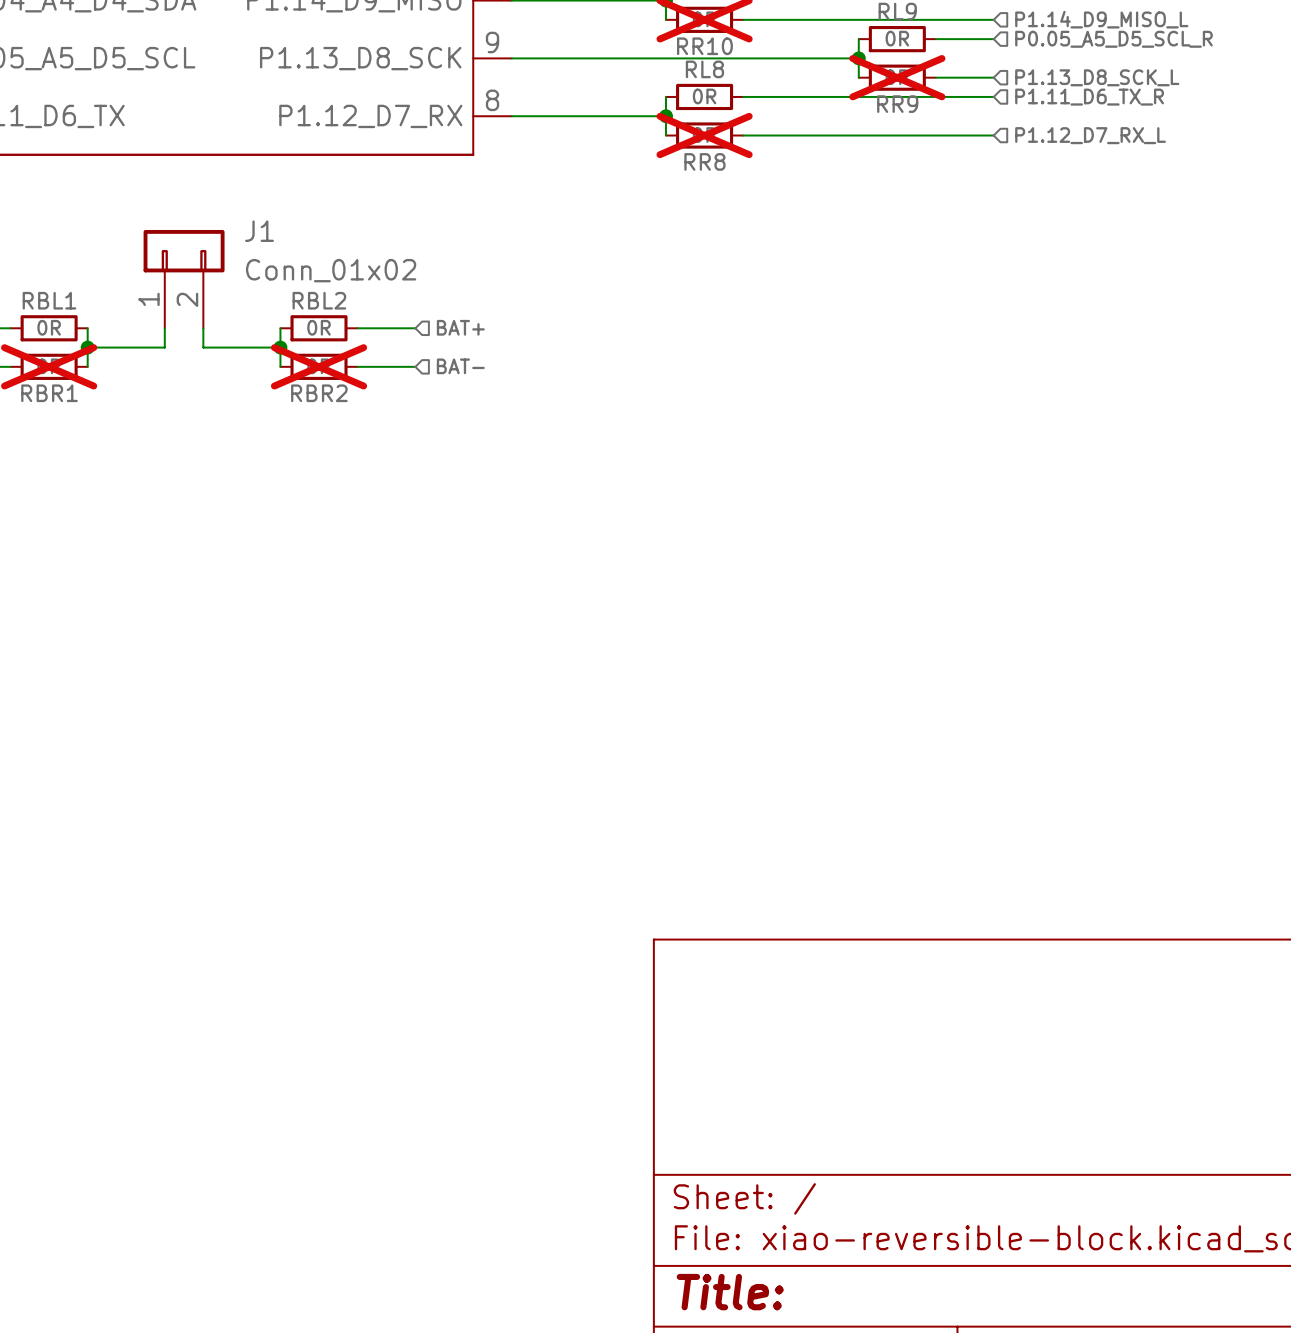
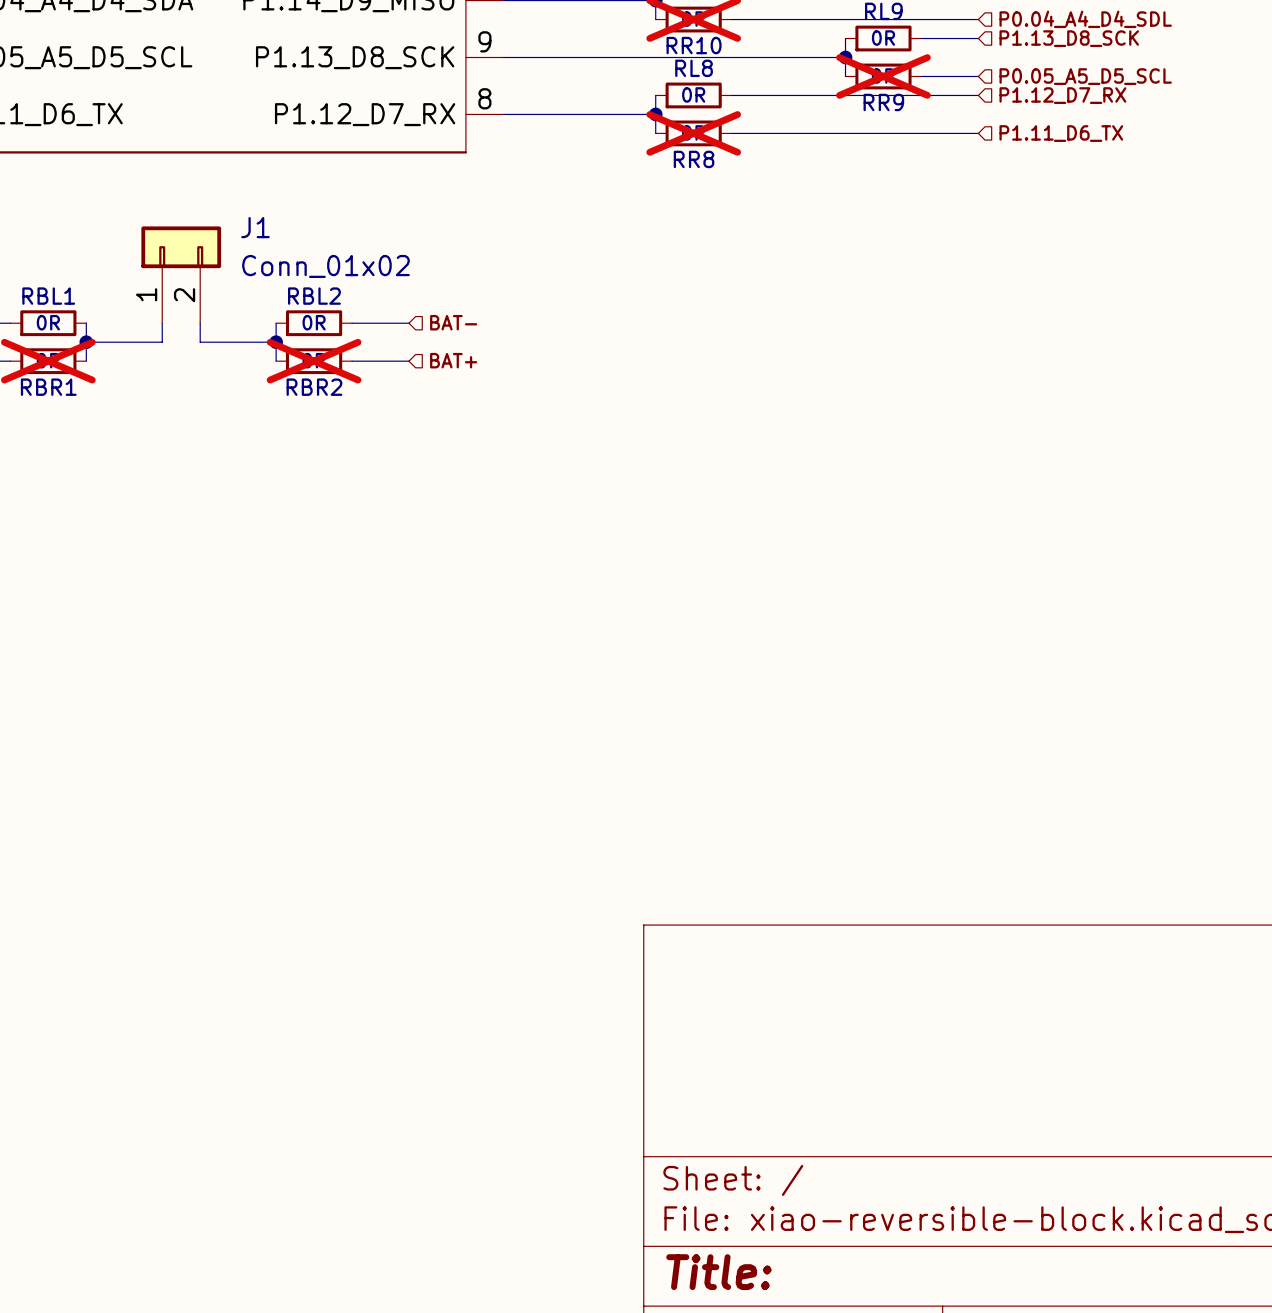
hierarchical label: P1.14_D9_MISO_L (1101, 19) -> P0.04_A4_D4_SDL (1085, 19)
hierarchical label: P0.05_A5_D5_SCL_R (1113, 39) -> P1.13_D8_SCK (1069, 38)
hierarchical label: P1.13_D8_SCK_L (1097, 77) -> P0.05_A5_D5_SCL (1085, 76)
hierarchical label: P1.11_D6_TX_R (1089, 97) -> P1.12_D7_RX (1062, 95)
hierarchical label: P1.12_D7_RX_L (1090, 135) -> P1.11_D6_TX (1061, 133)
hierarchical label: BAT+ (460, 327) -> BAT- (453, 322)
hierarchical label: BAT- (460, 366) -> BAT+ (453, 360)

